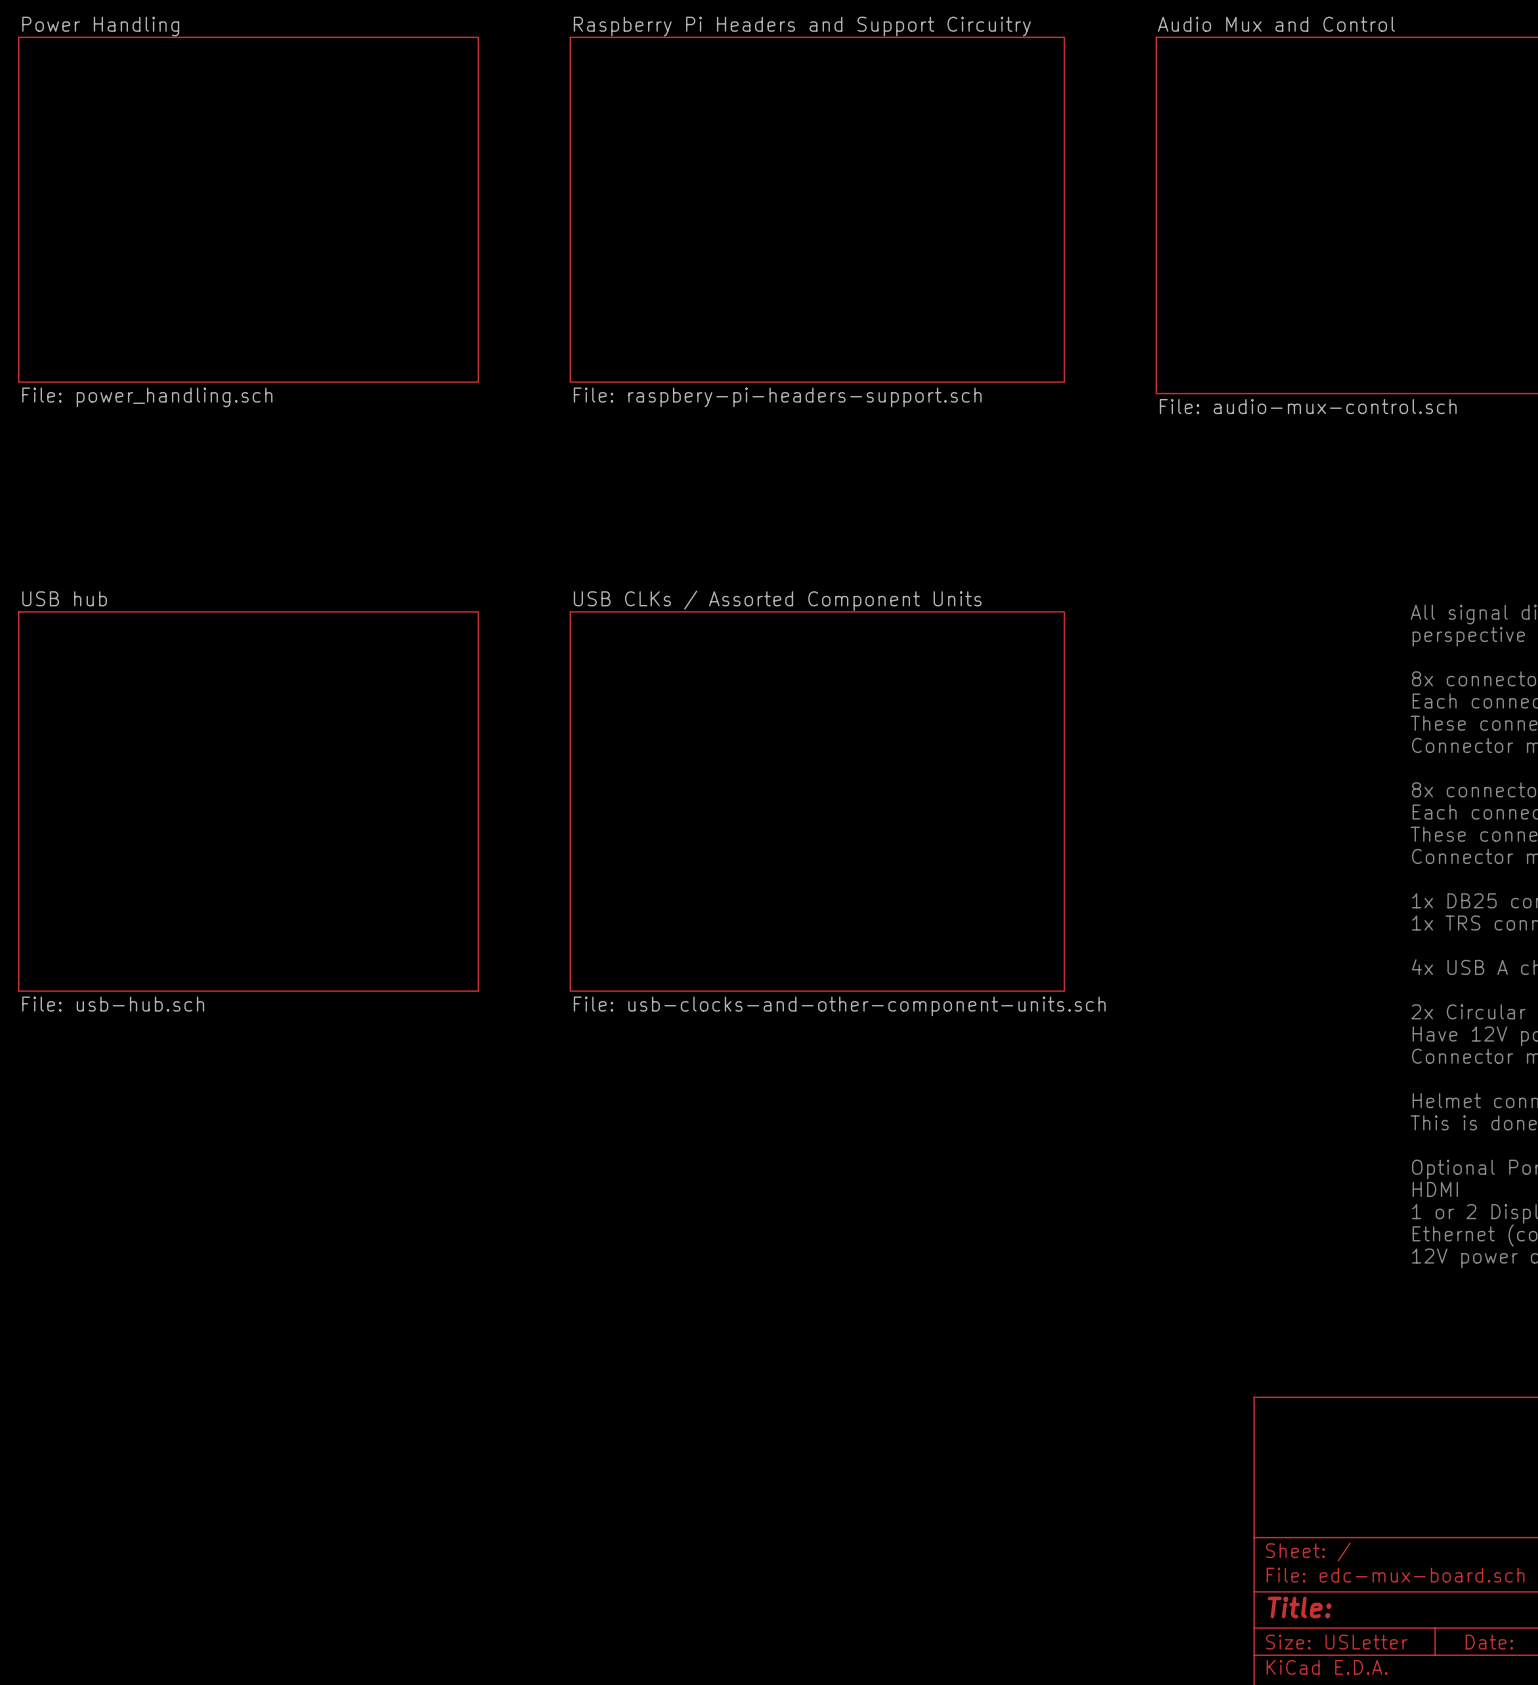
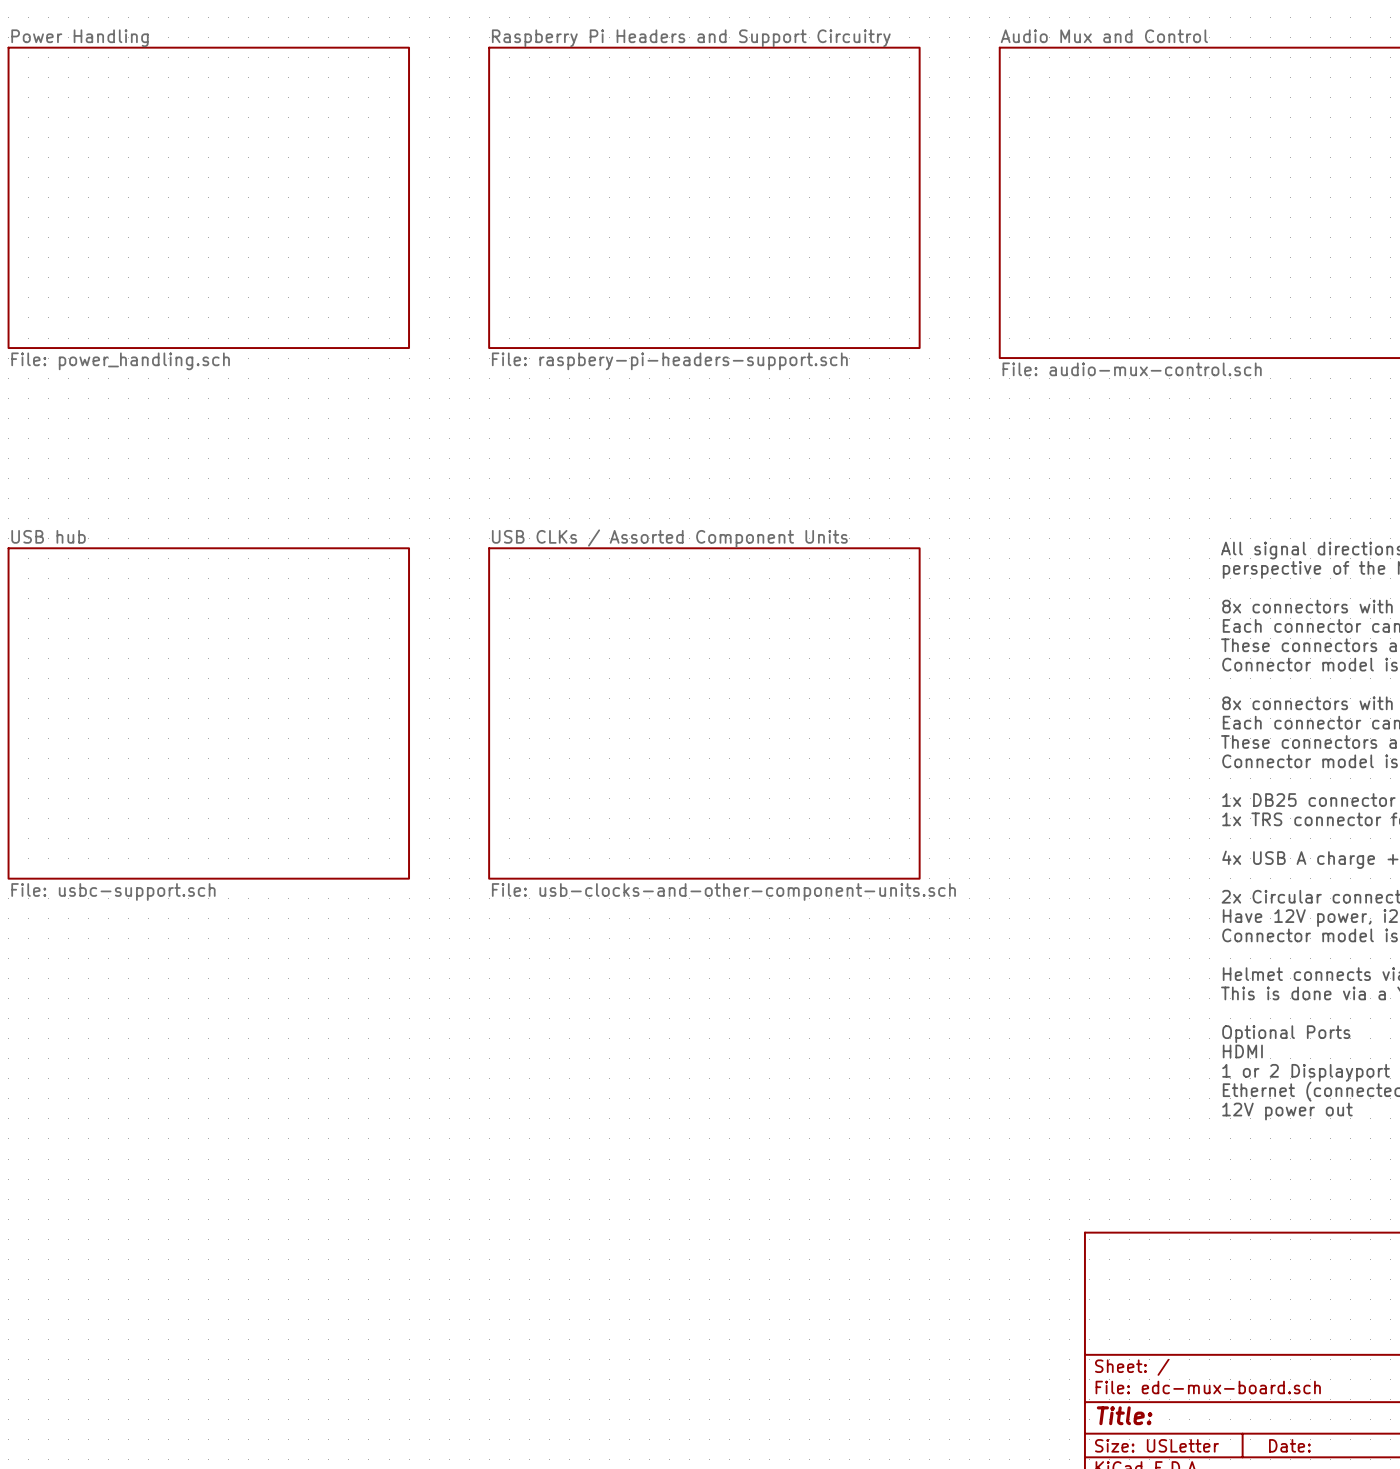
sheet USB hub value: File: usb-hub.sch (113, 1004) -> File: usbc-support.sch (113, 891)

